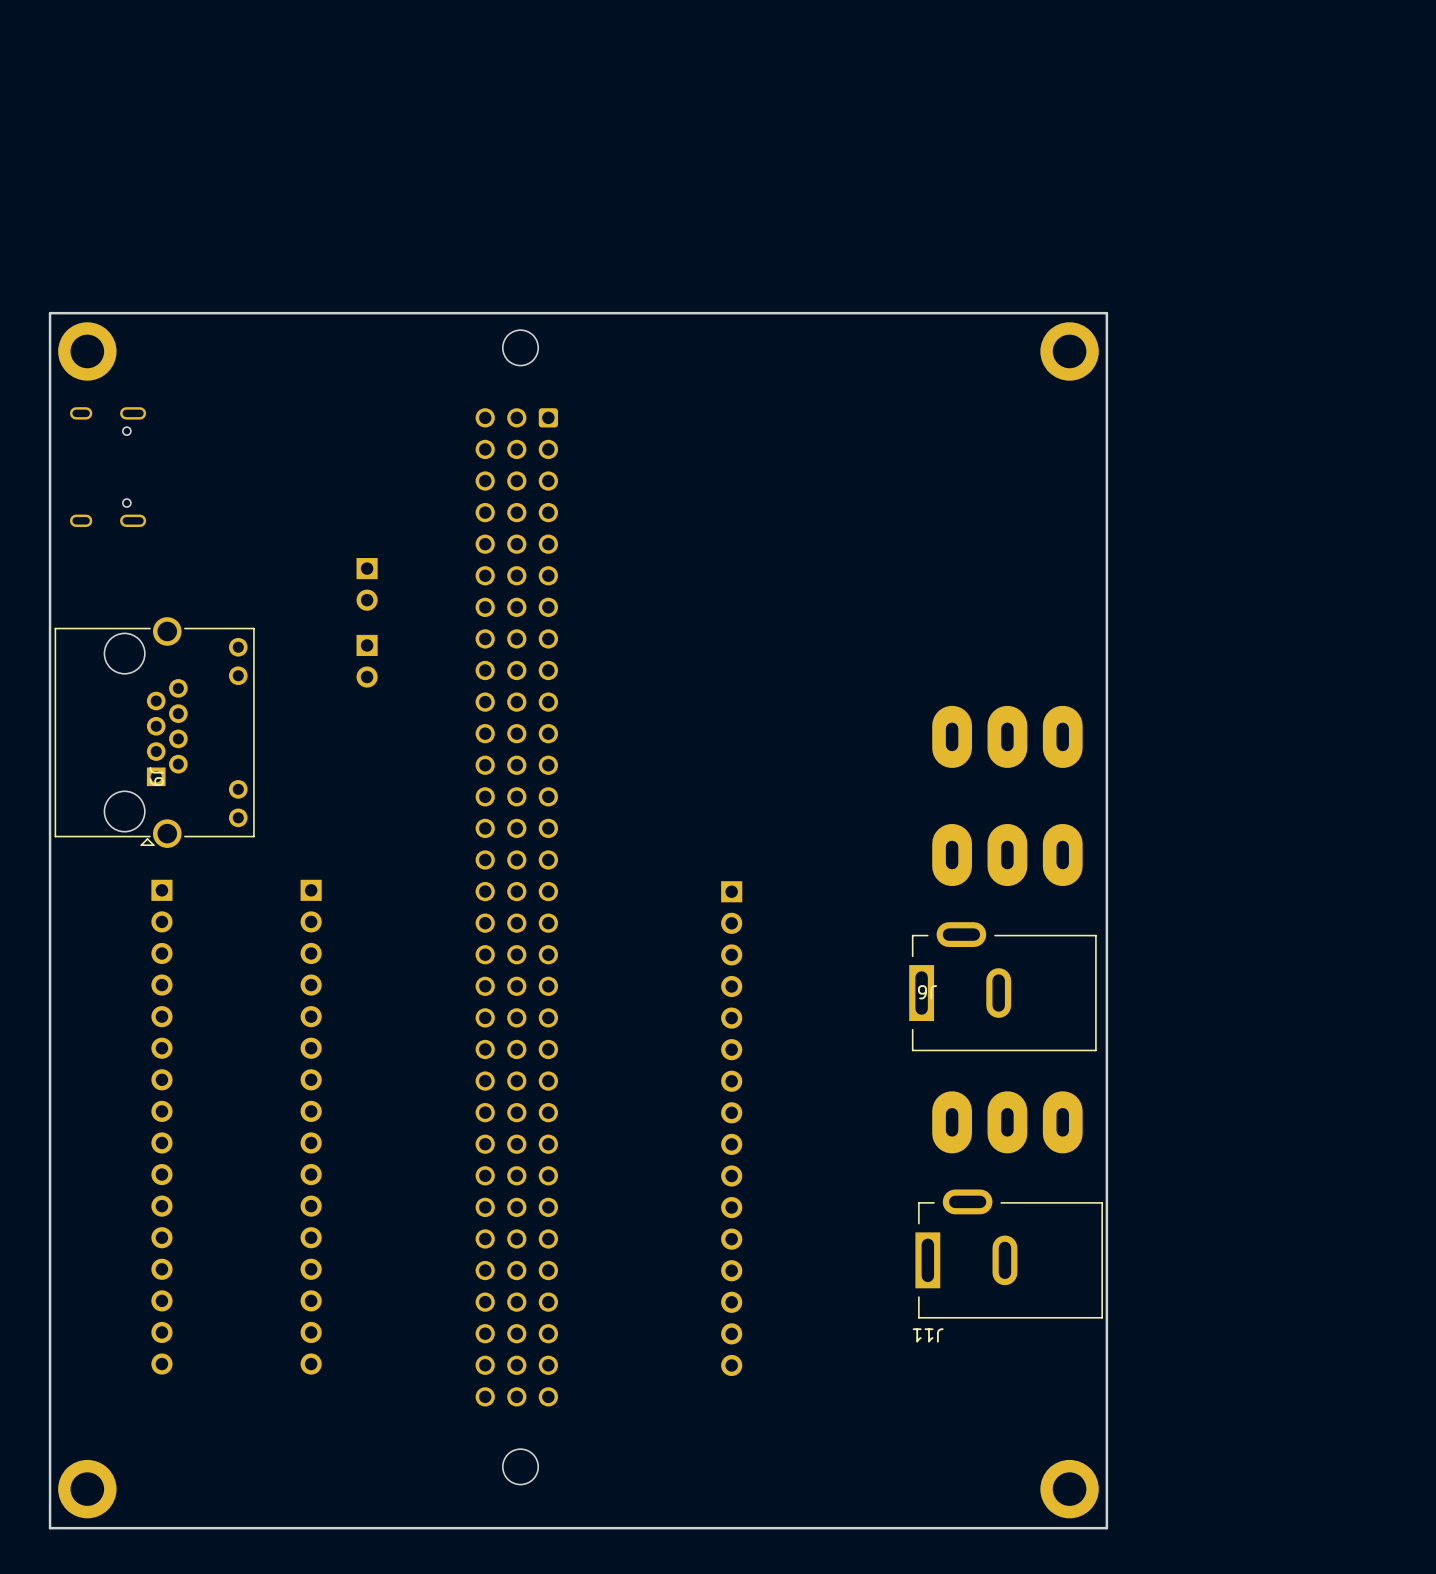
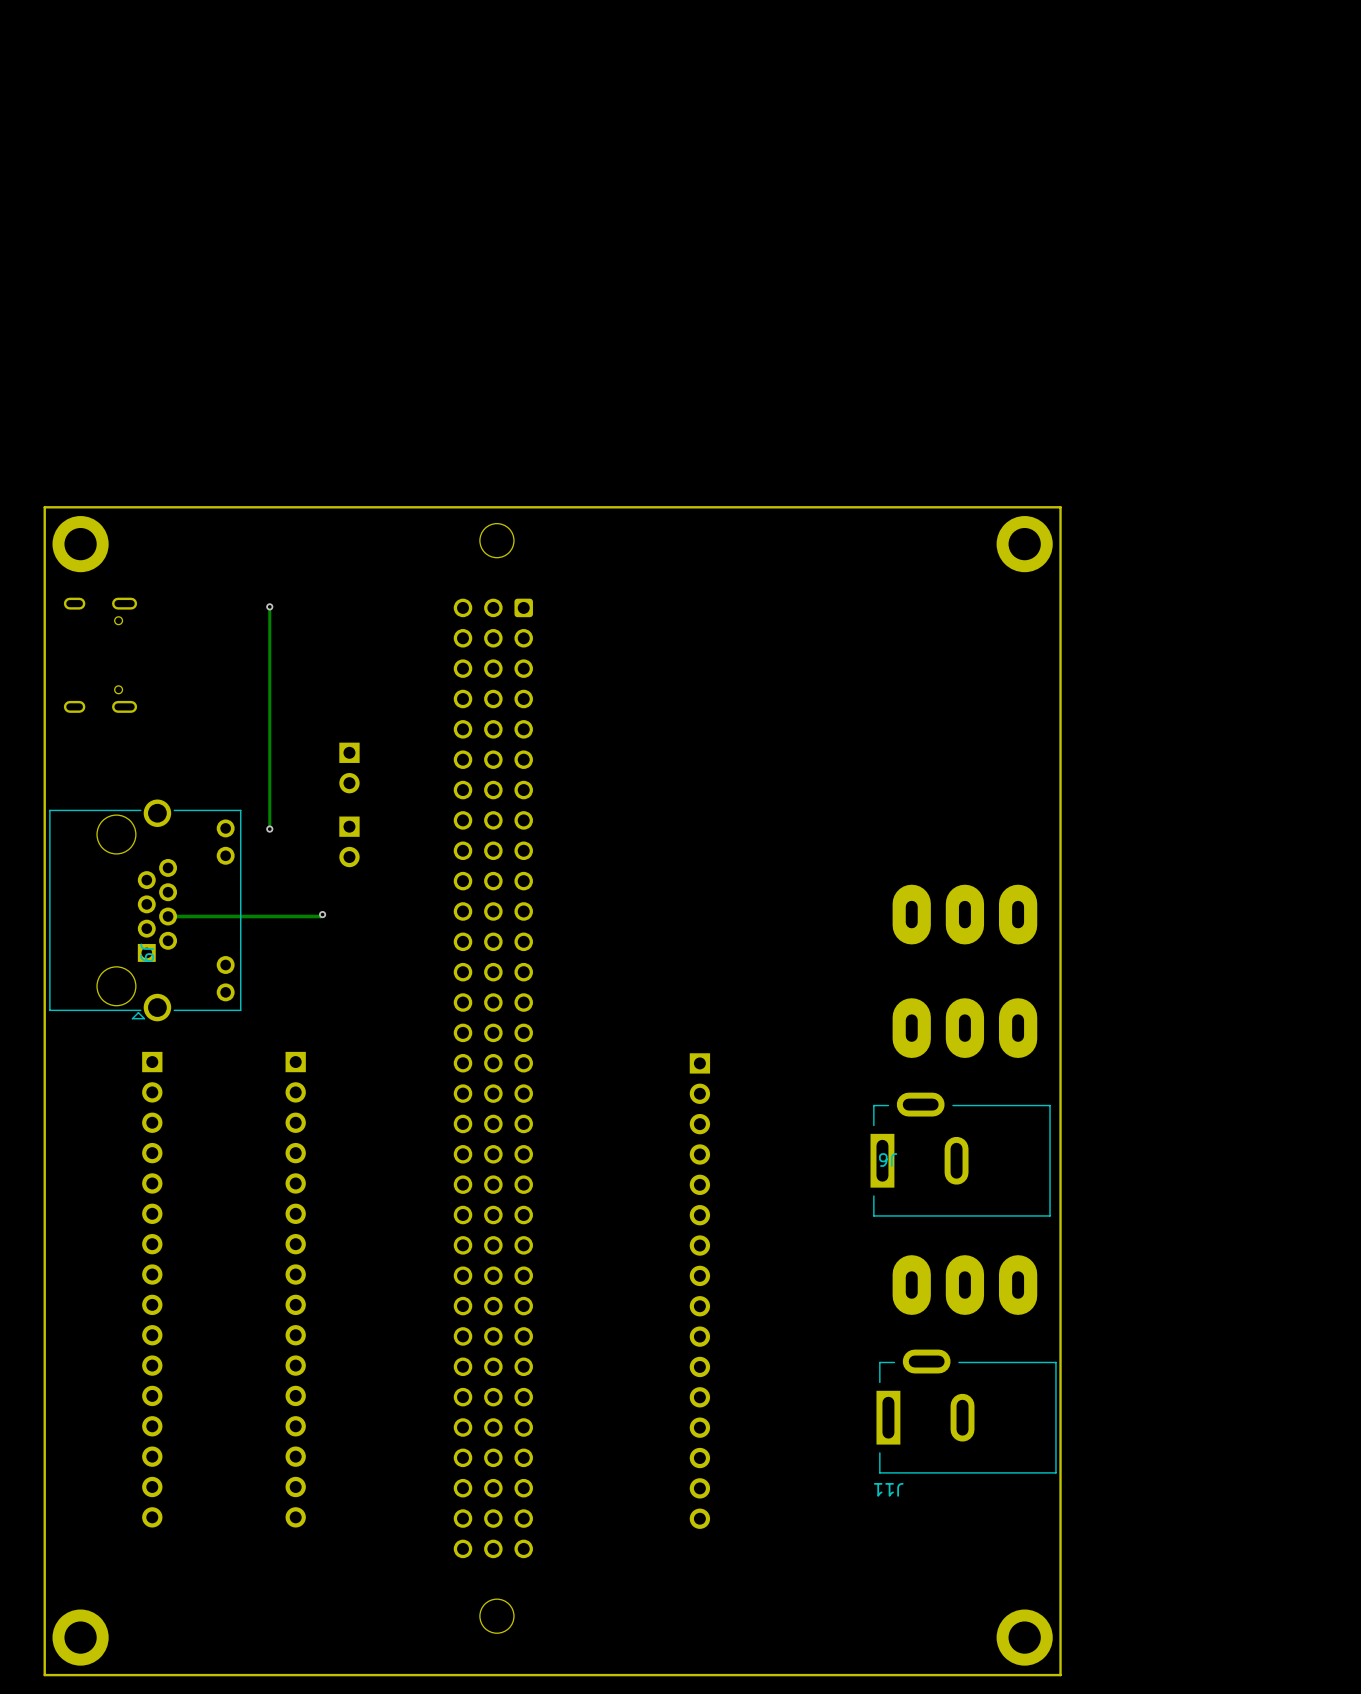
track: none -> (269, 606) (269, 829)
via: none -> (269, 606)
via: none -> (269, 829)
track: none -> (322, 914) (320, 916) (168, 916)
via: none -> (322, 914)

